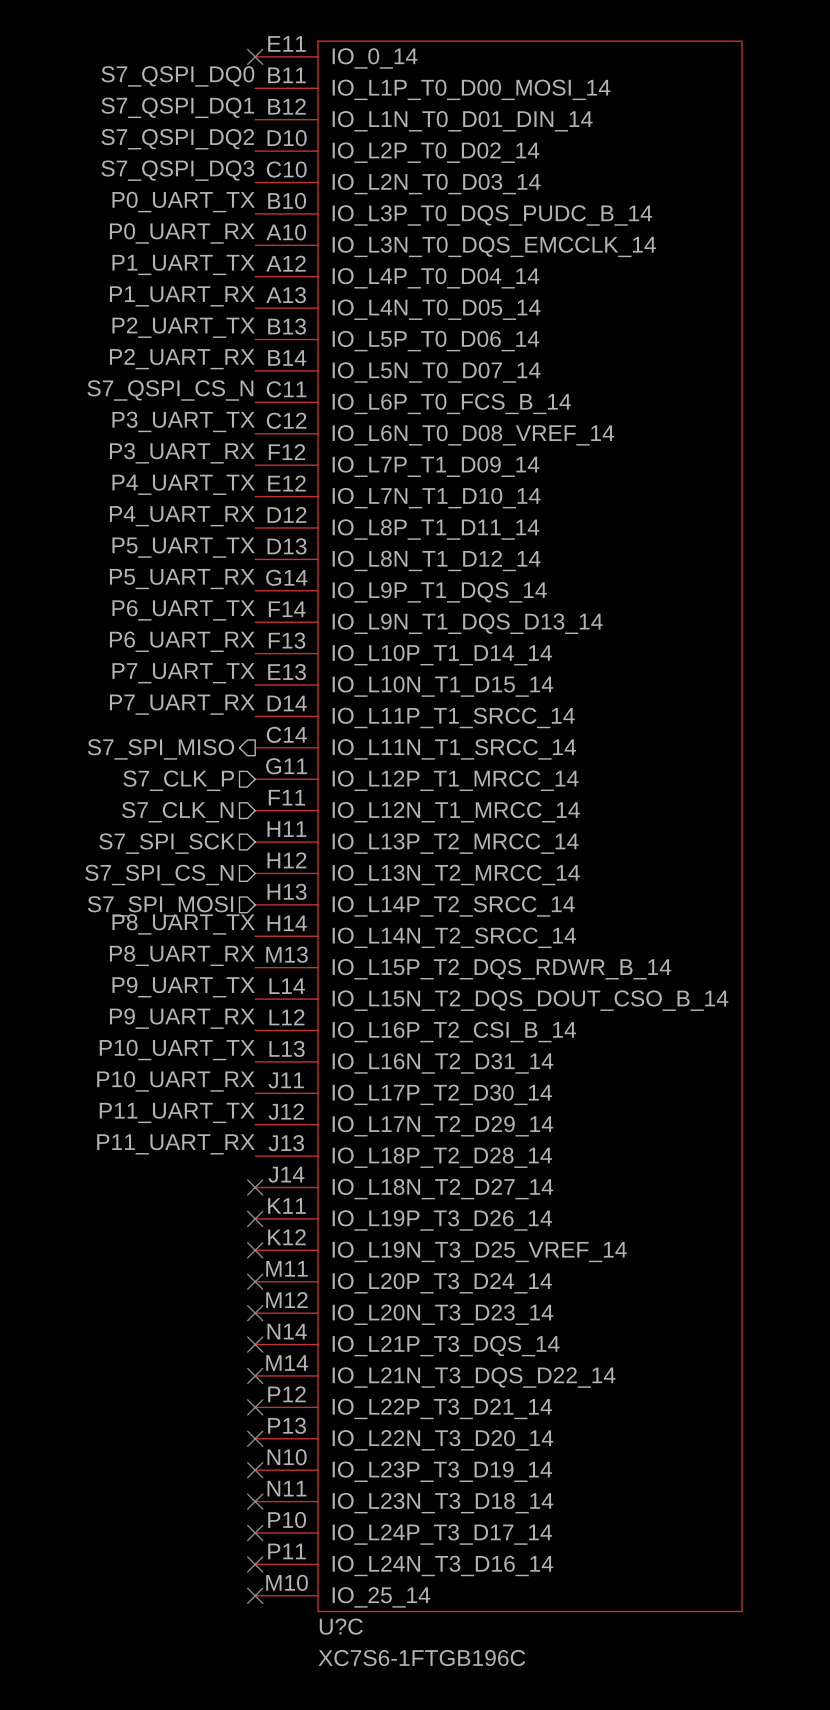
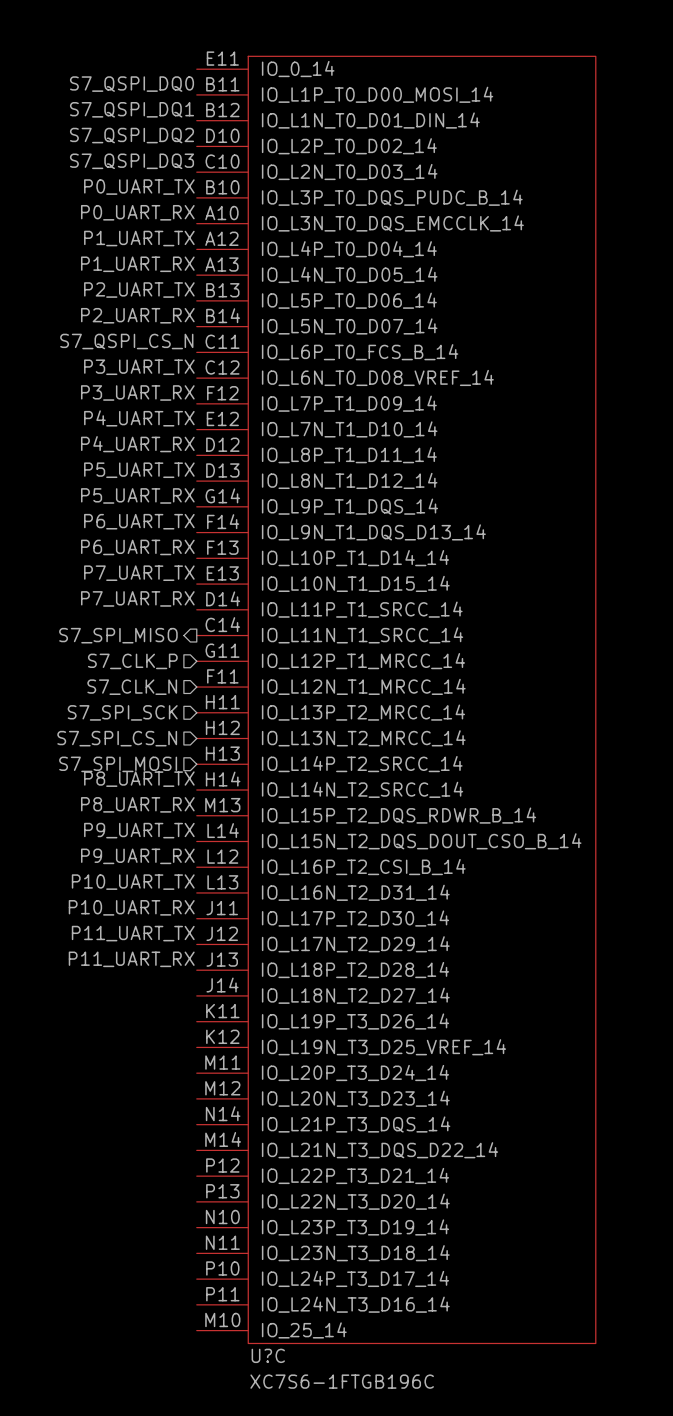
no-connect mark: (255, 56) -> none
no-connect mark: (255, 1187) -> none
no-connect mark: (255, 1218) -> none
no-connect mark: (255, 1250) -> none
no-connect mark: (255, 1281) -> none
no-connect mark: (255, 1313) -> none
no-connect mark: (255, 1344) -> none
no-connect mark: (255, 1375) -> none
no-connect mark: (255, 1407) -> none
no-connect mark: (255, 1438) -> none
no-connect mark: (255, 1470) -> none
no-connect mark: (255, 1501) -> none
no-connect mark: (255, 1532) -> none
no-connect mark: (255, 1564) -> none
no-connect mark: (255, 1595) -> none

